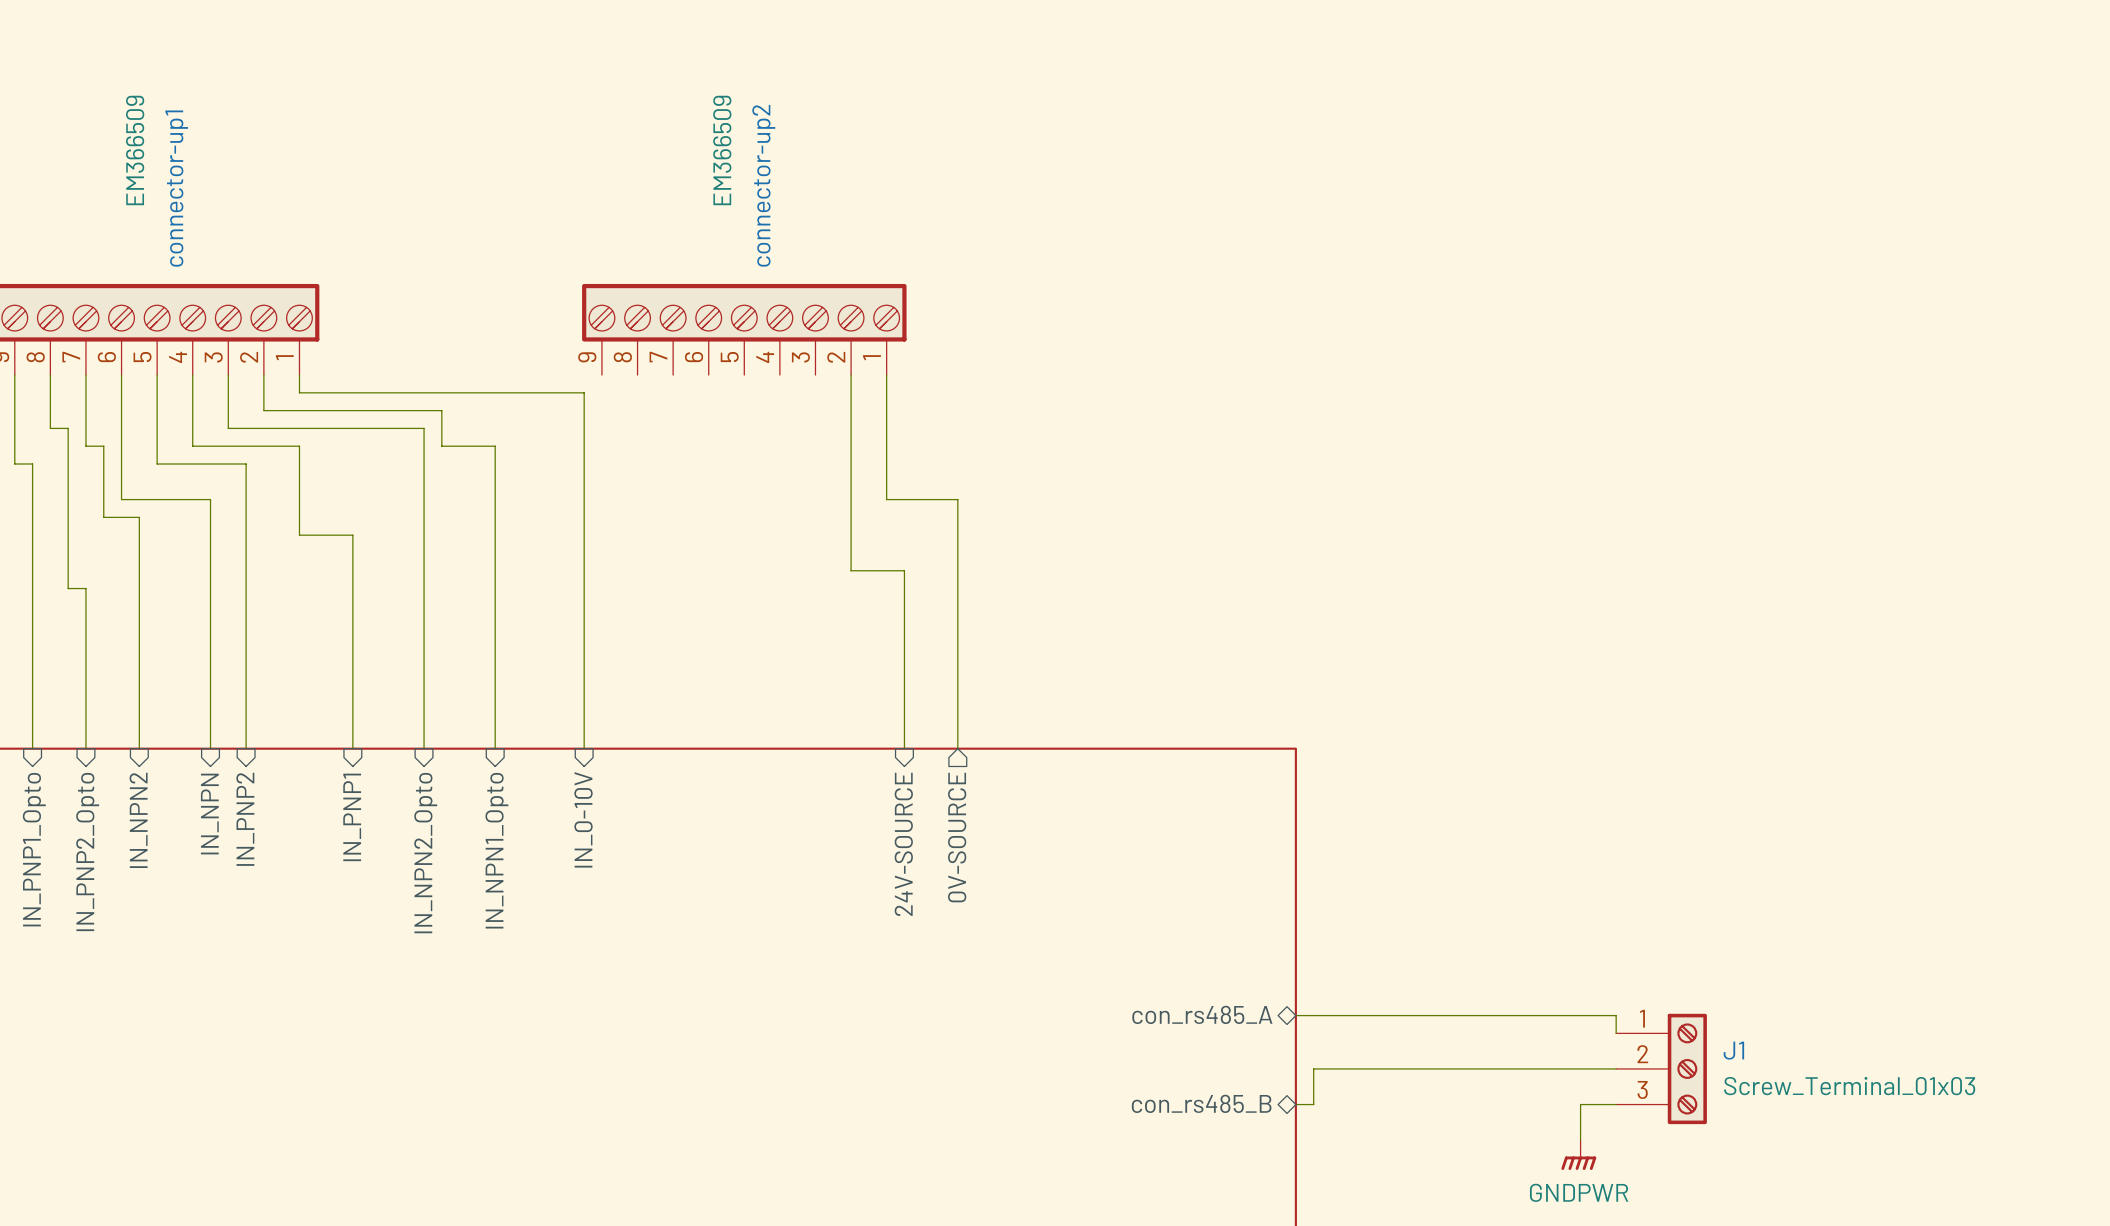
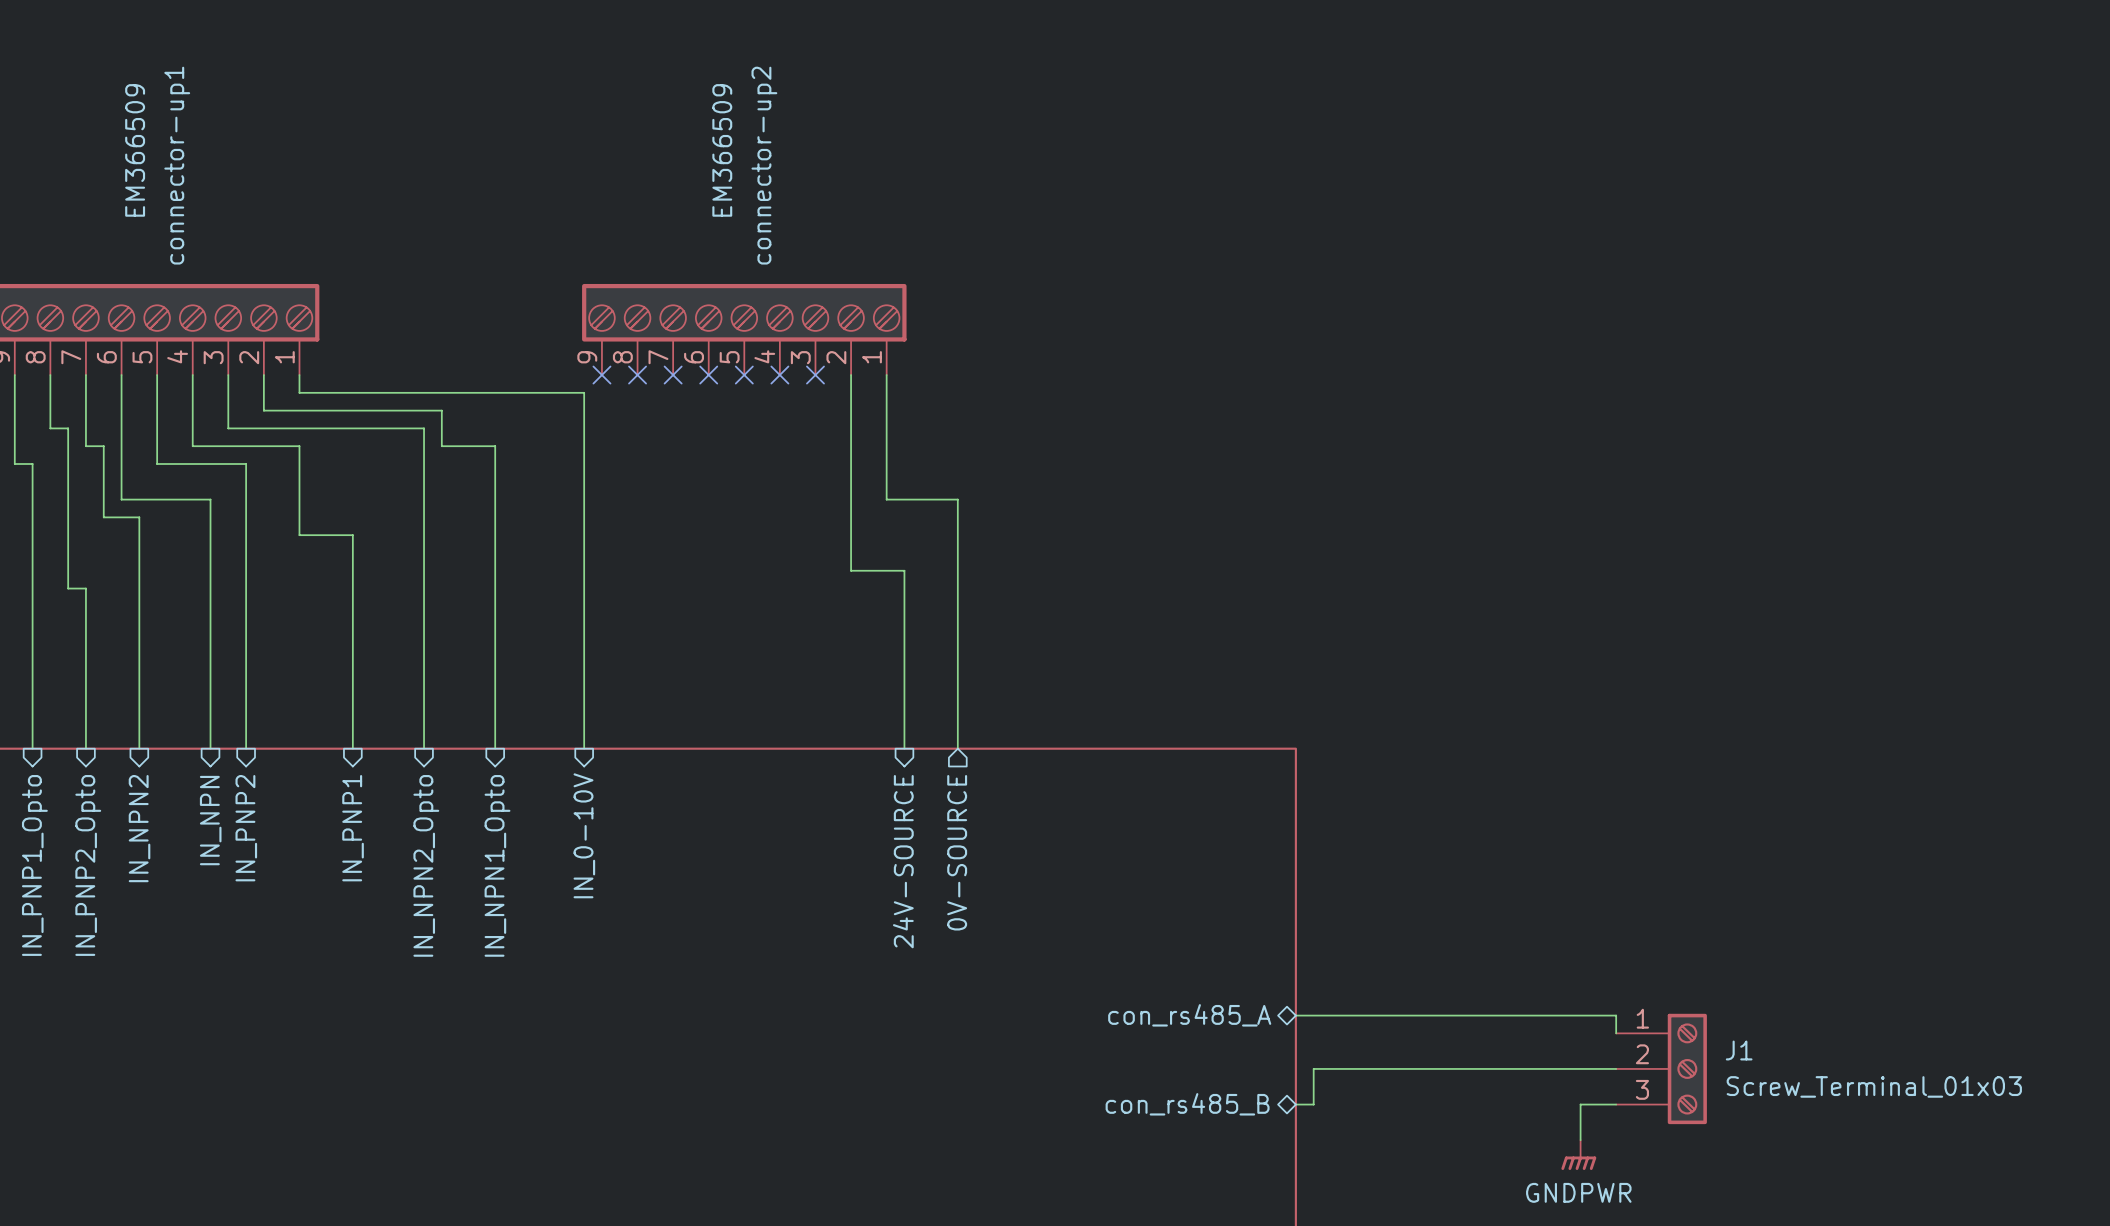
no-connect mark: none -> (601, 375)
no-connect mark: none -> (637, 375)
no-connect mark: none -> (673, 375)
no-connect mark: none -> (708, 375)
no-connect mark: none -> (744, 375)
no-connect mark: none -> (779, 375)
no-connect mark: none -> (815, 375)

